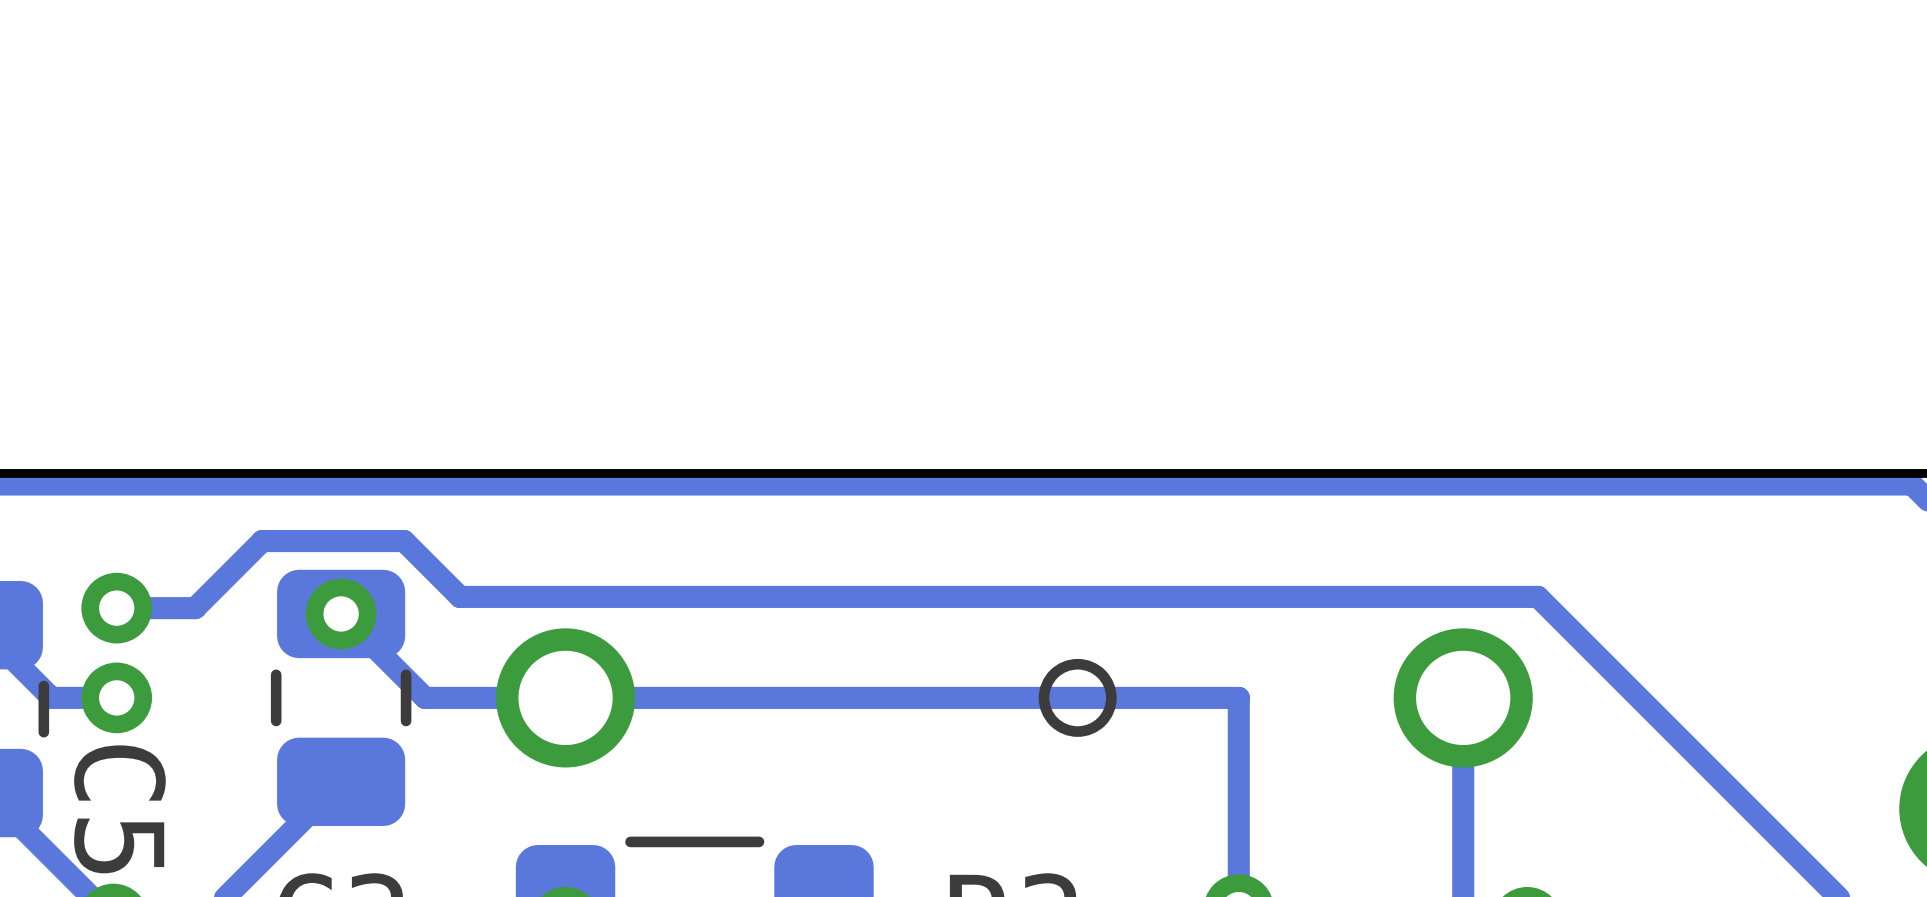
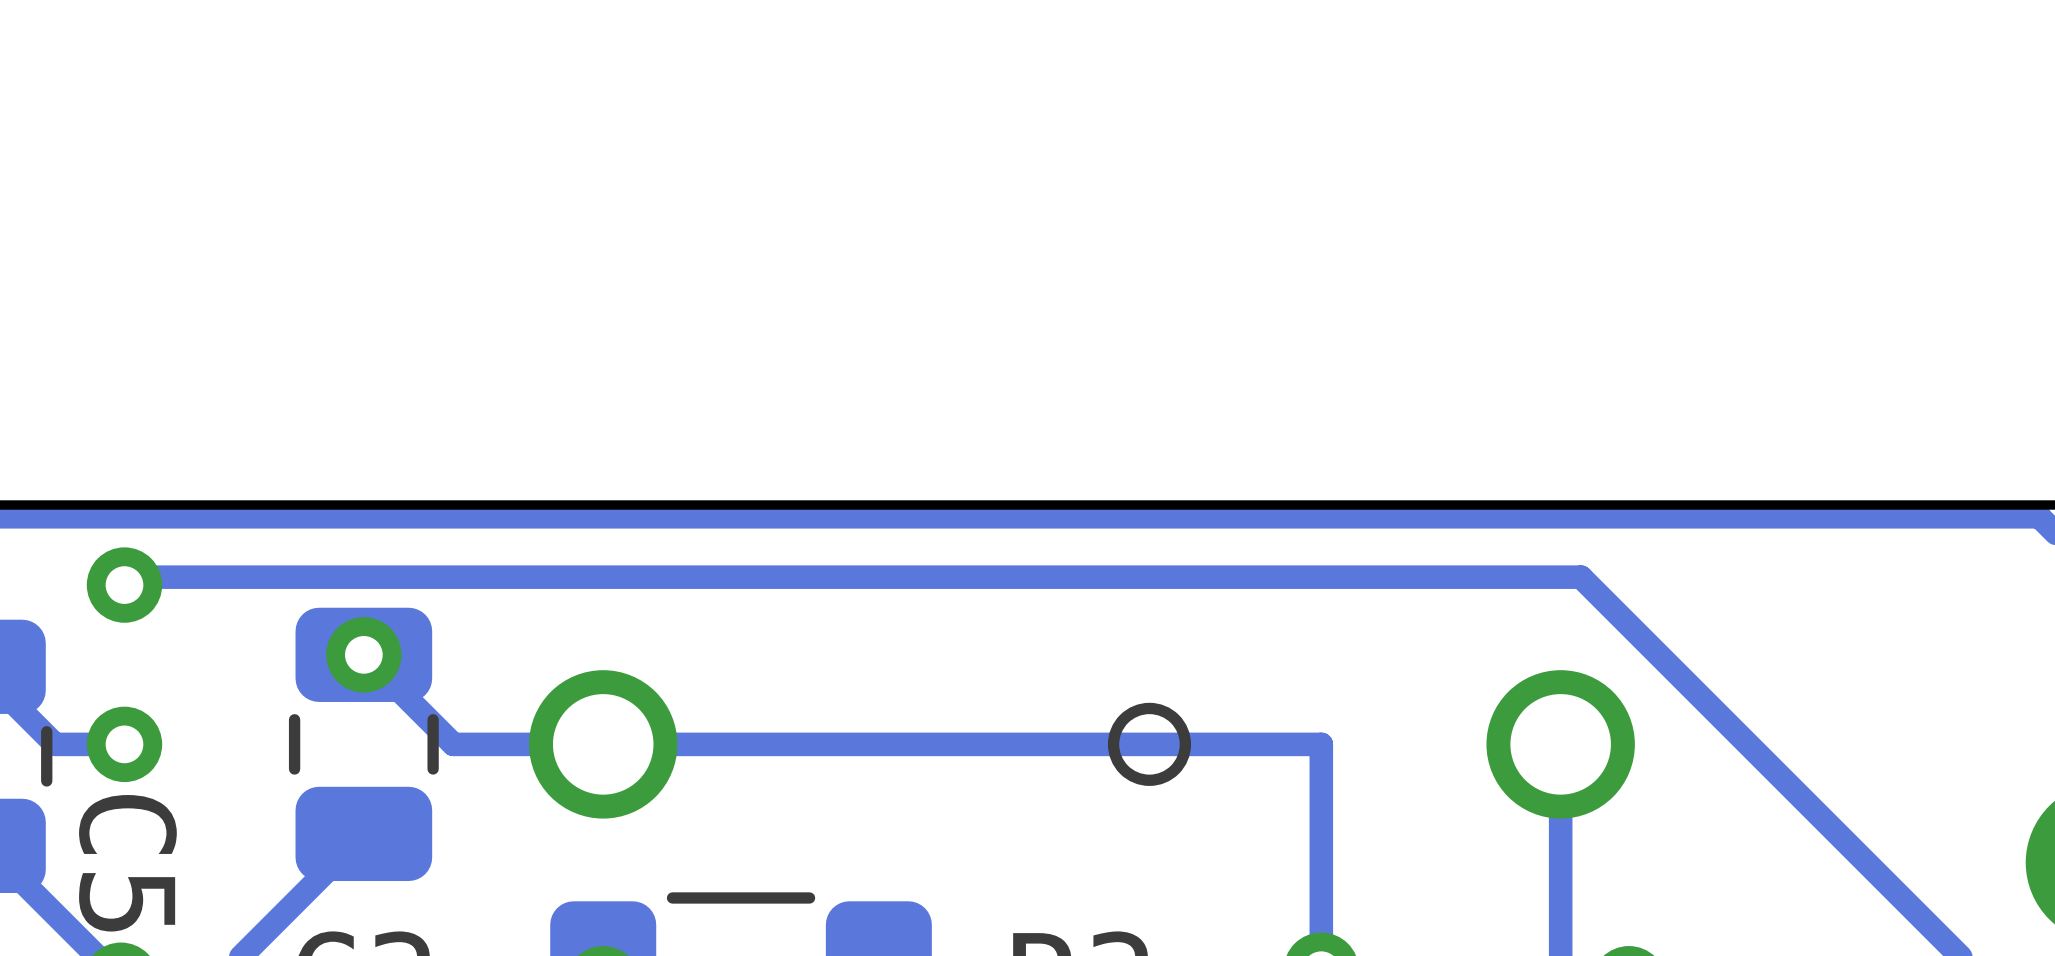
track: (1538, 596) (459, 596) (404, 541) (262, 541) (195, 608) (116, 608) -> (1640, 636) (1580, 577) (132, 577) (124, 585)
via position: (116, 608) -> (124, 585)

